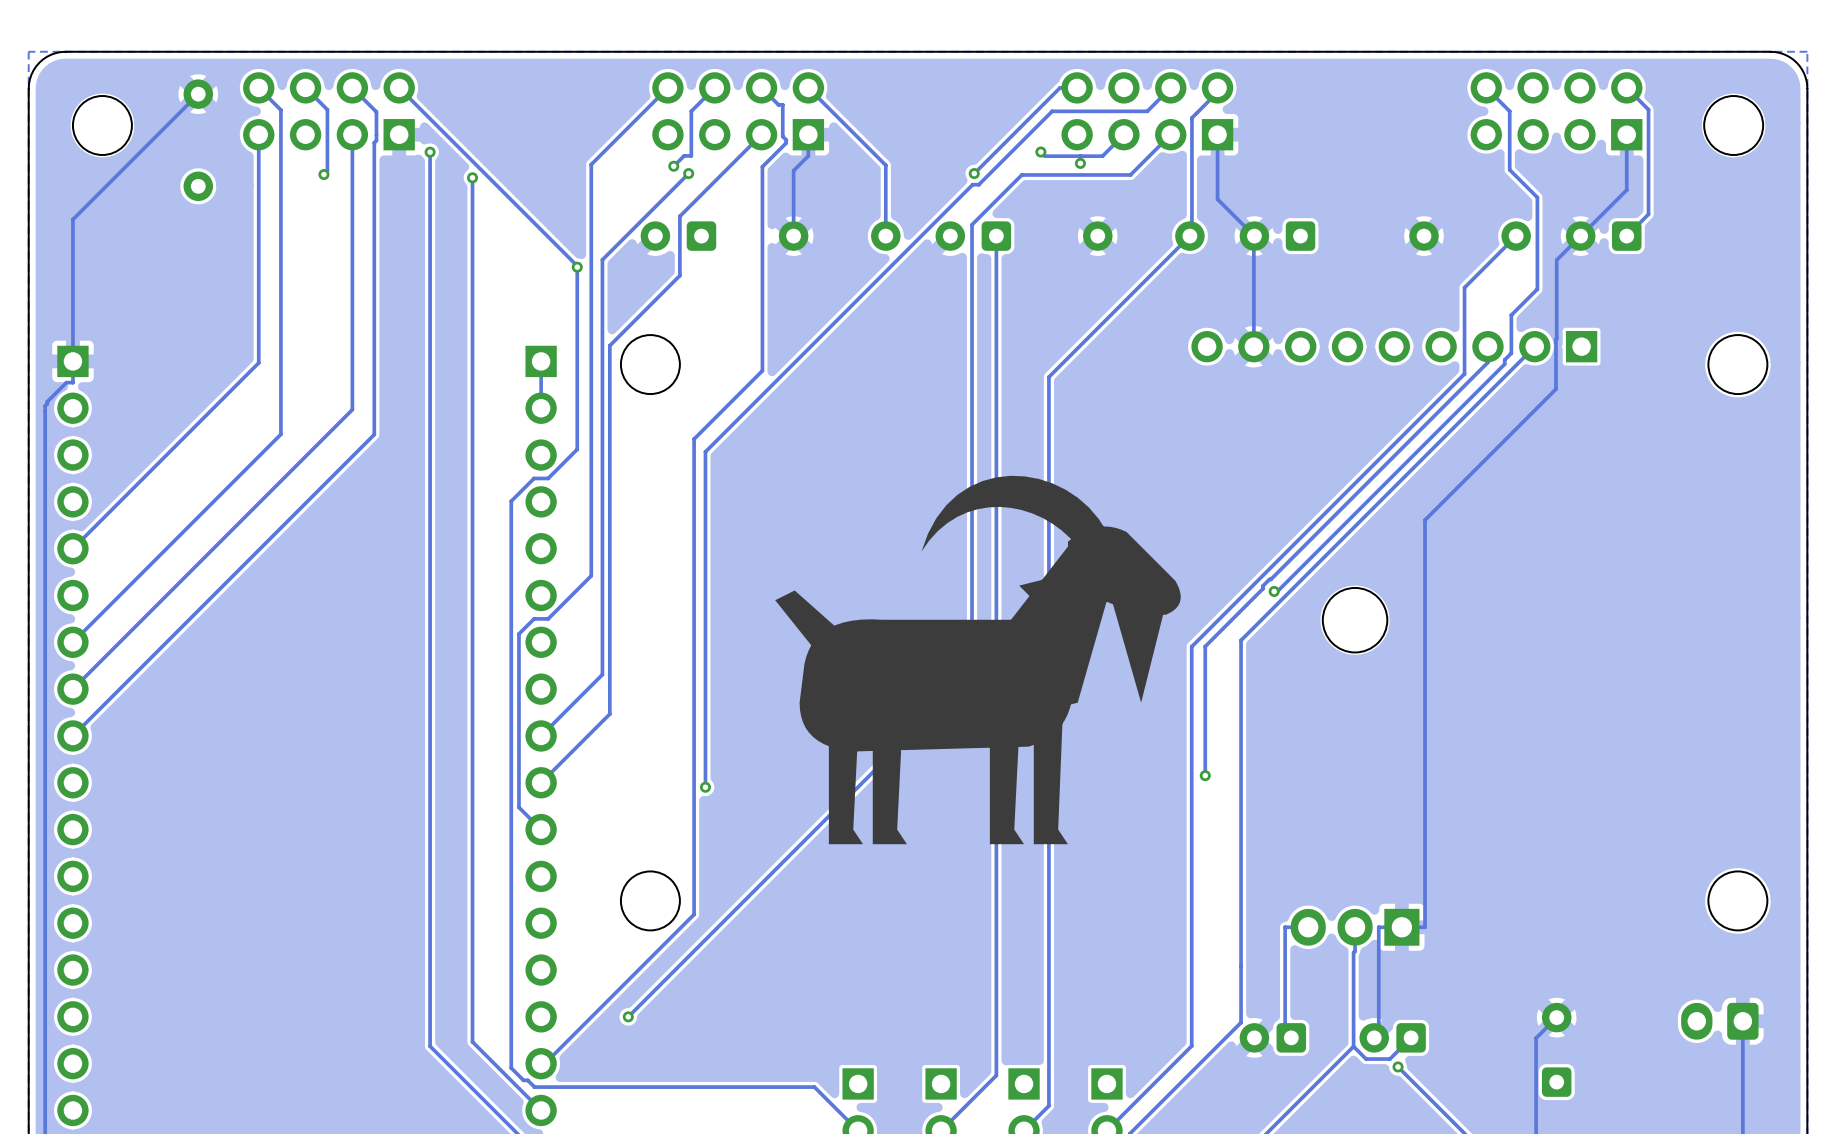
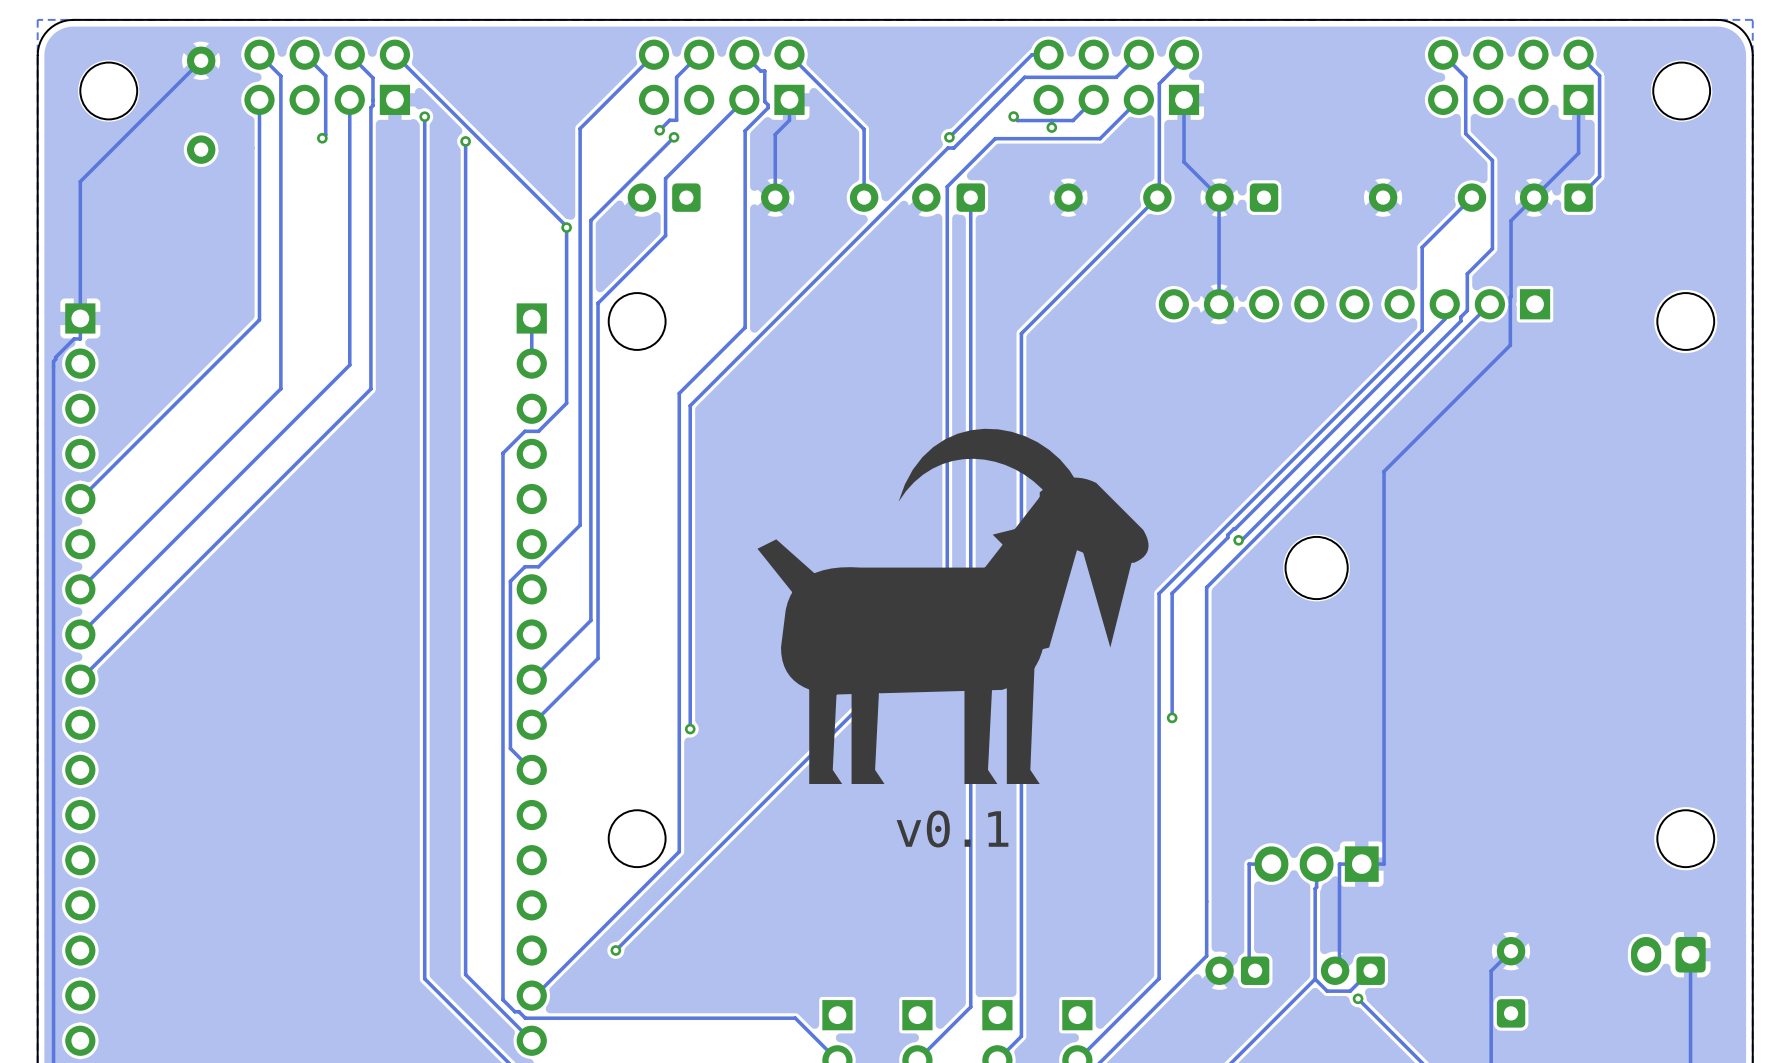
text: none -> v0.1 (952, 829)

